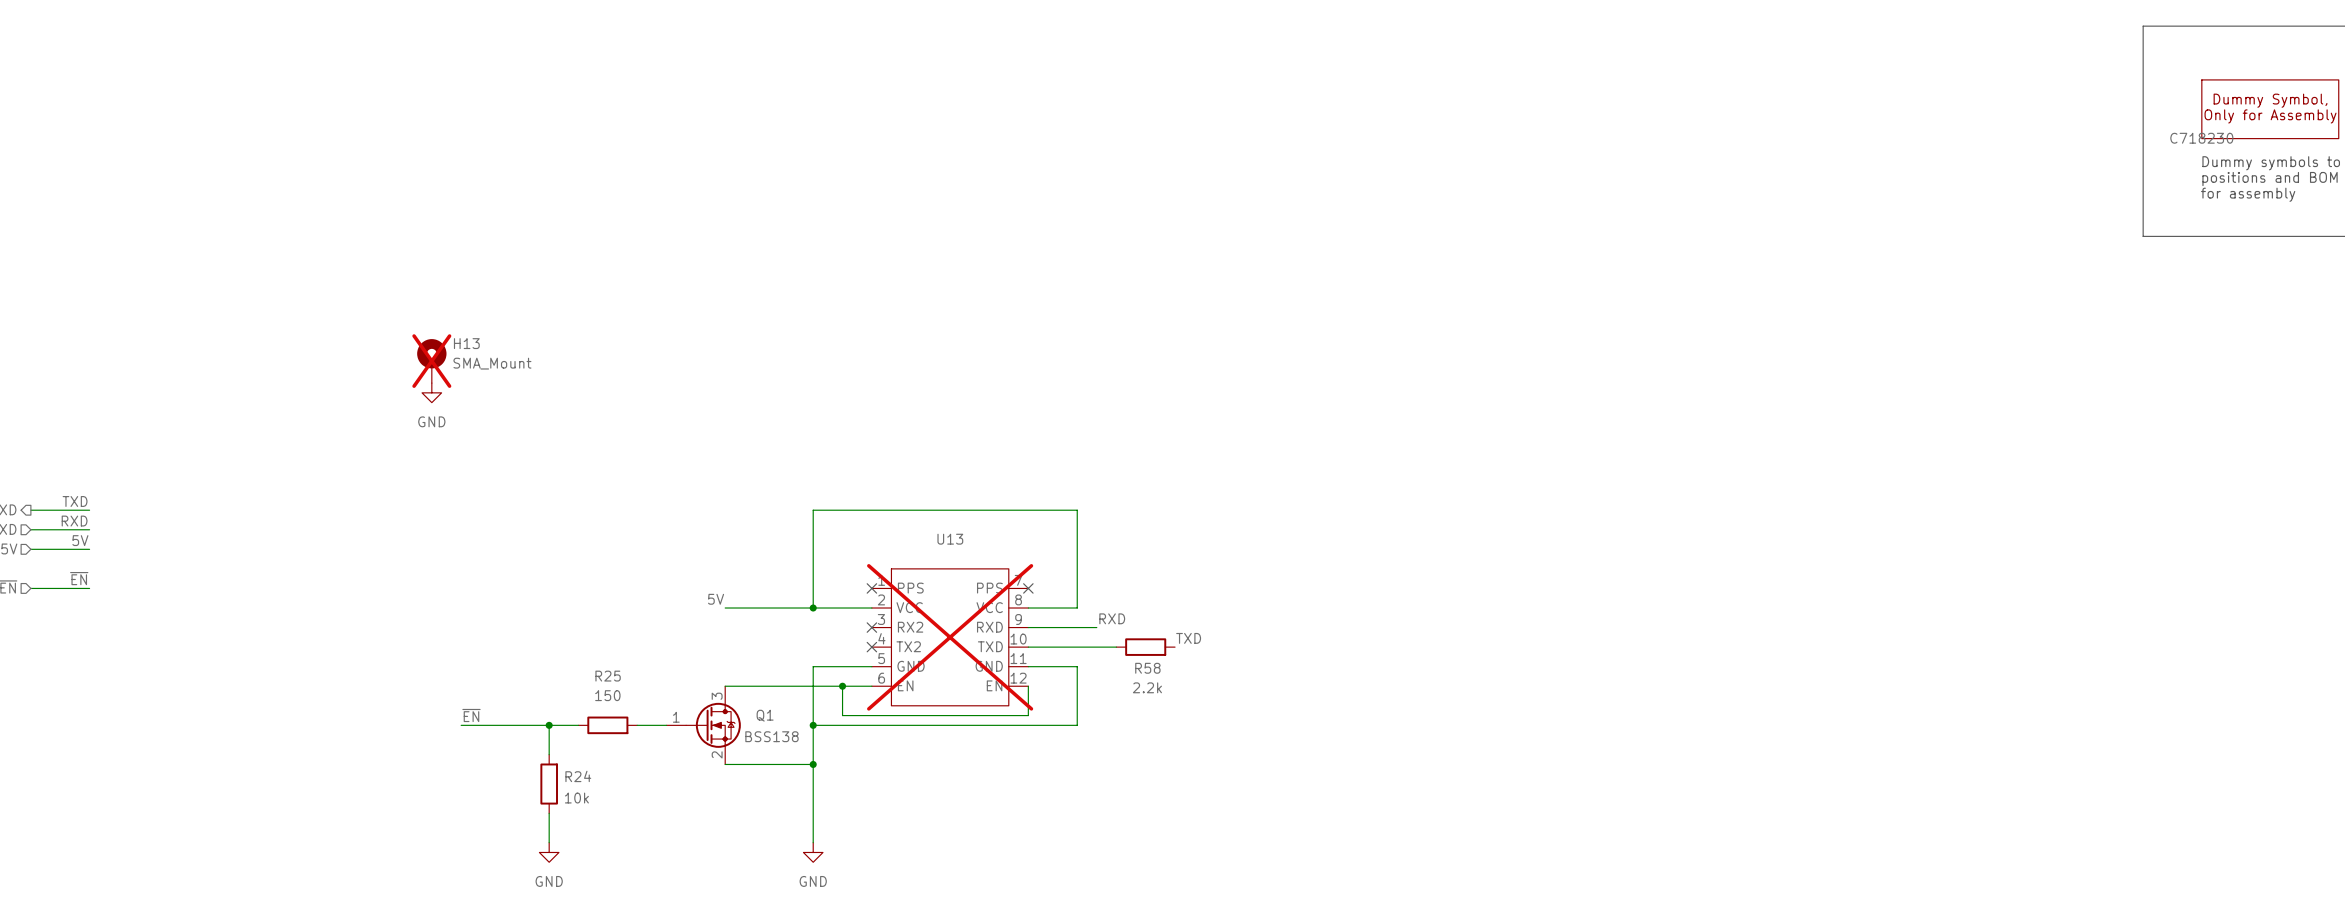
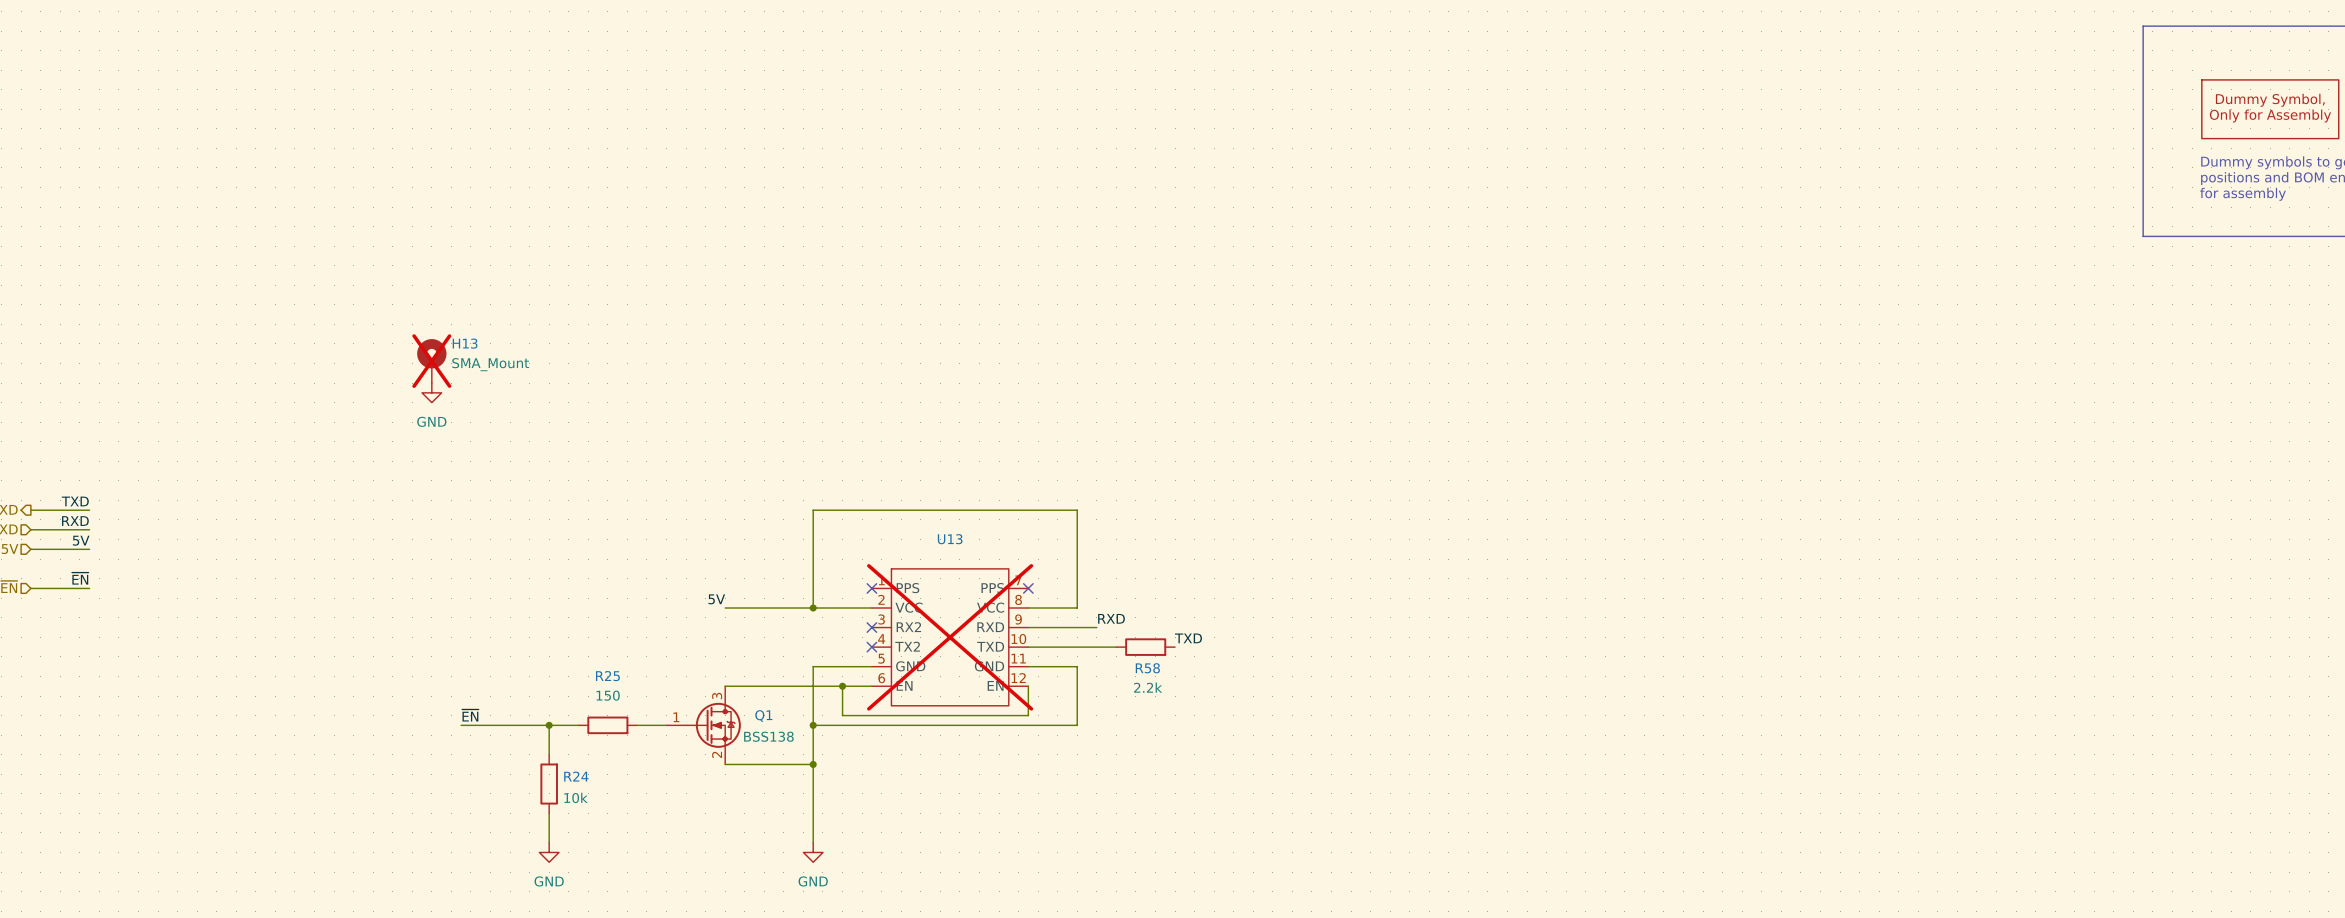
part text: C718230 (2201, 138) -> none

